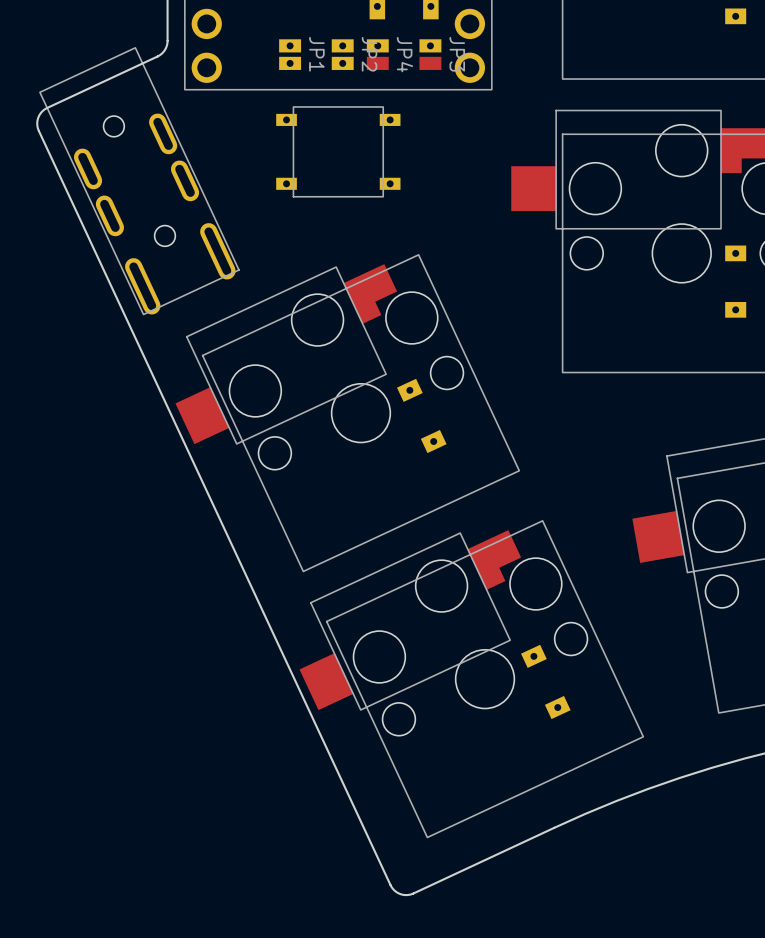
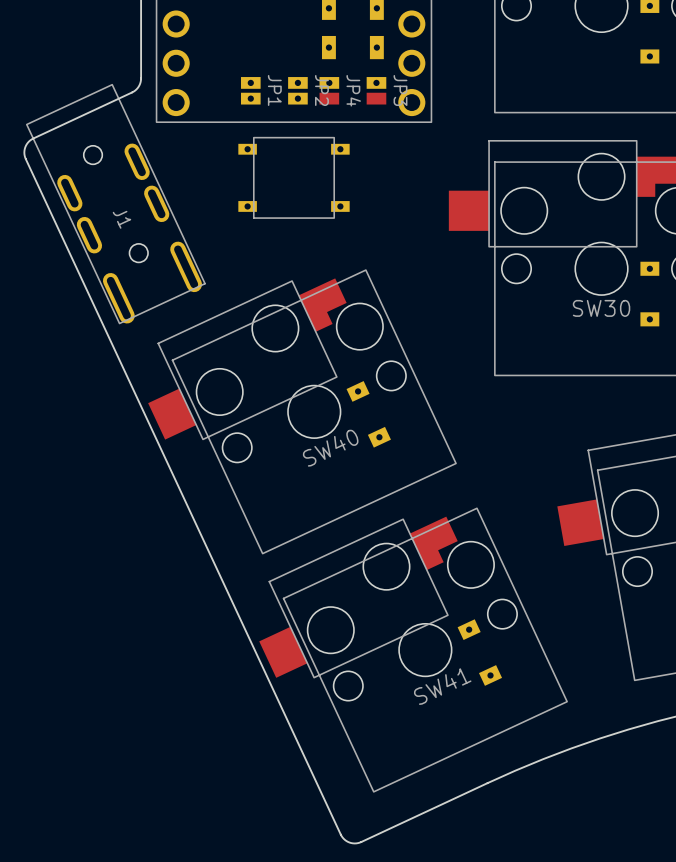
J1 name: none -> J1 (121, 219)
SW30 name: none -> SW30 (601, 308)
SW40 name: none -> SW40 (330, 448)
SW41 name: none -> SW41 (442, 686)

